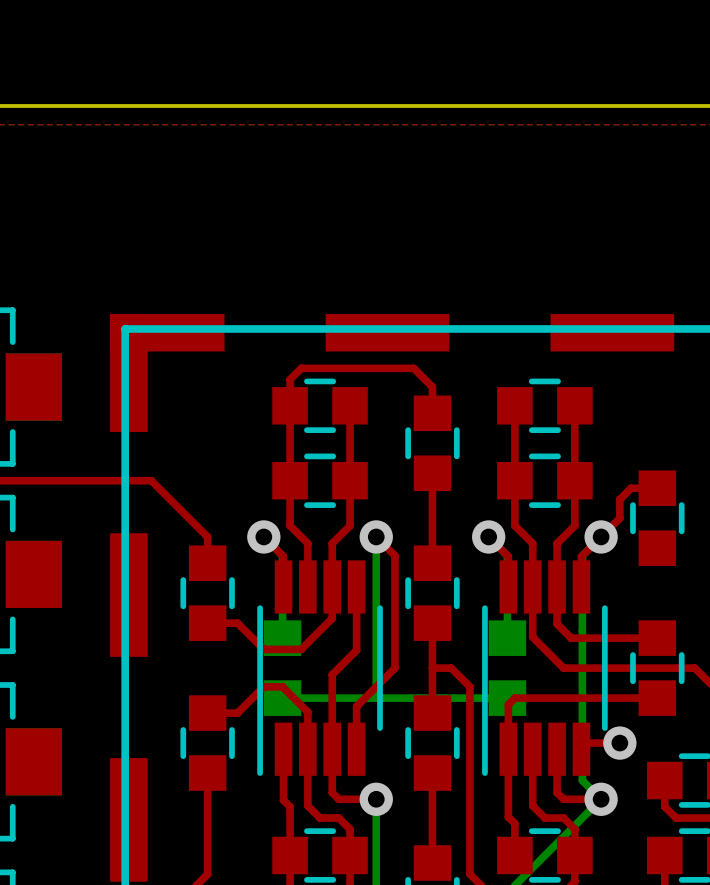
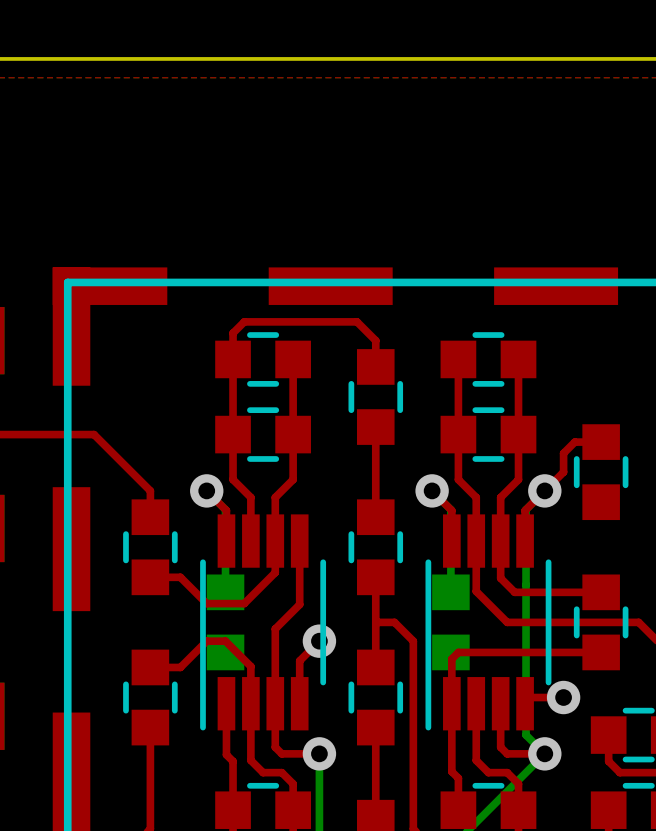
top track: (376, 536) (395, 555) (395, 668) (376, 686) -> none
bottom track: (376, 536) (376, 698) -> none
via position: (376, 536) -> (319, 641)
bottom track: (282, 698) (507, 698) -> none

